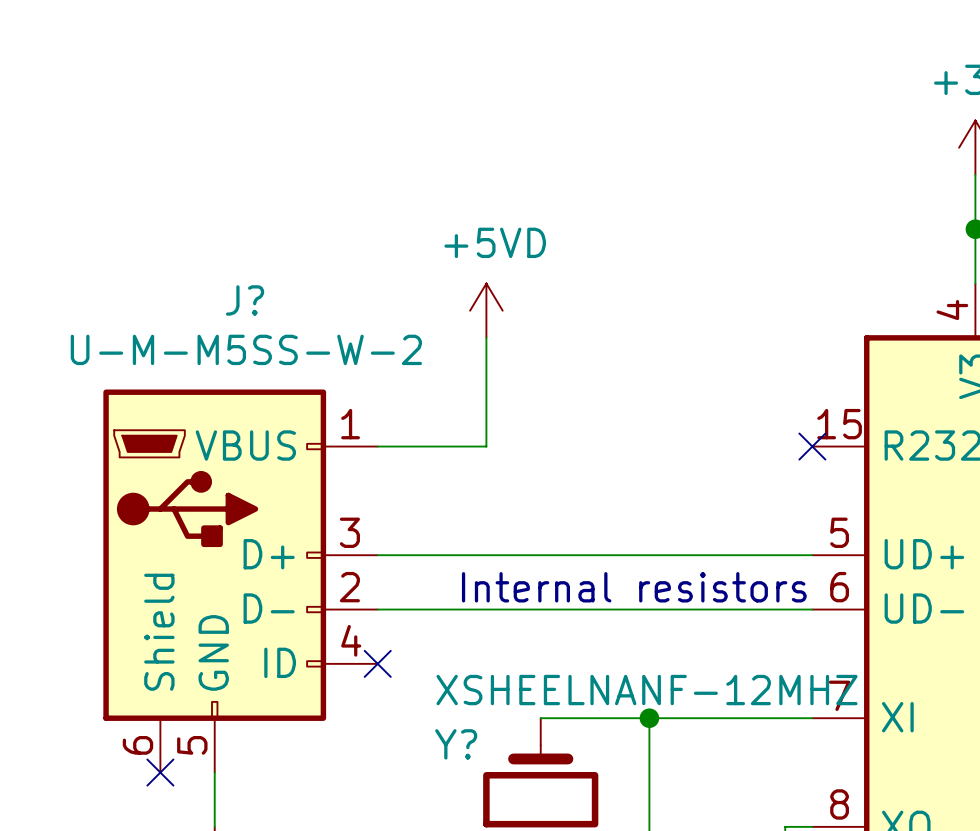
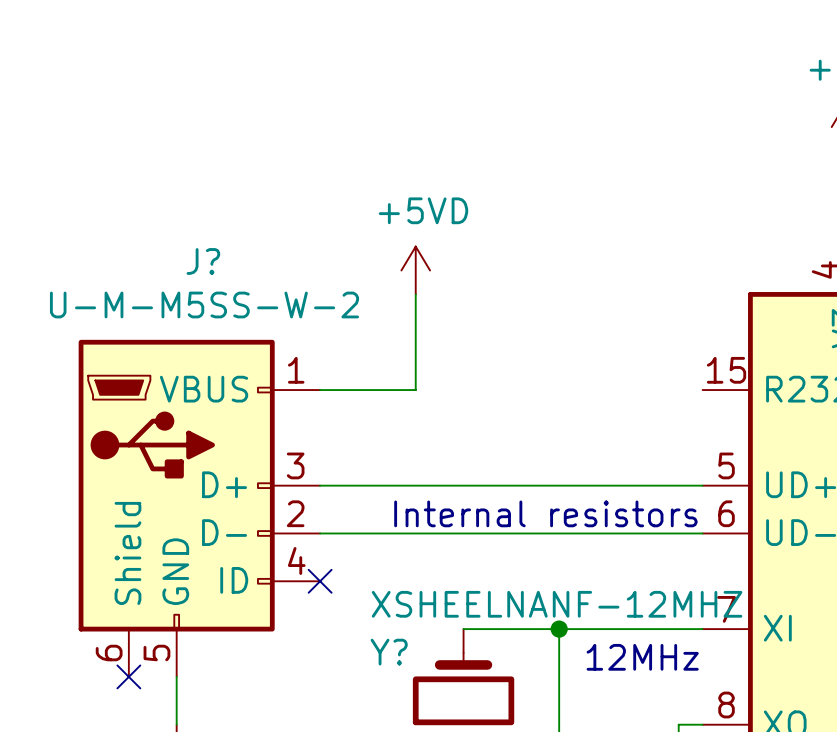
no-connect mark: (812, 446) -> none
text: none -> 12MHz (642, 657)

